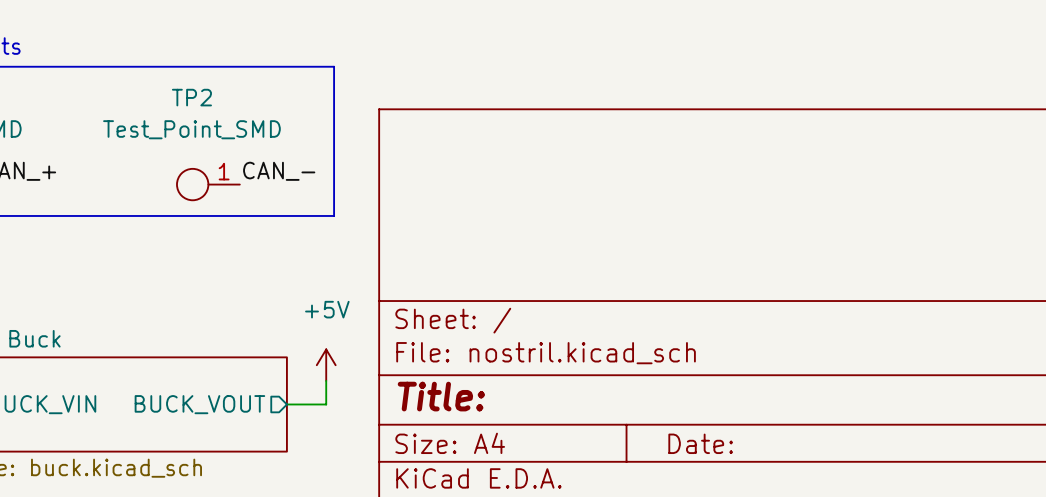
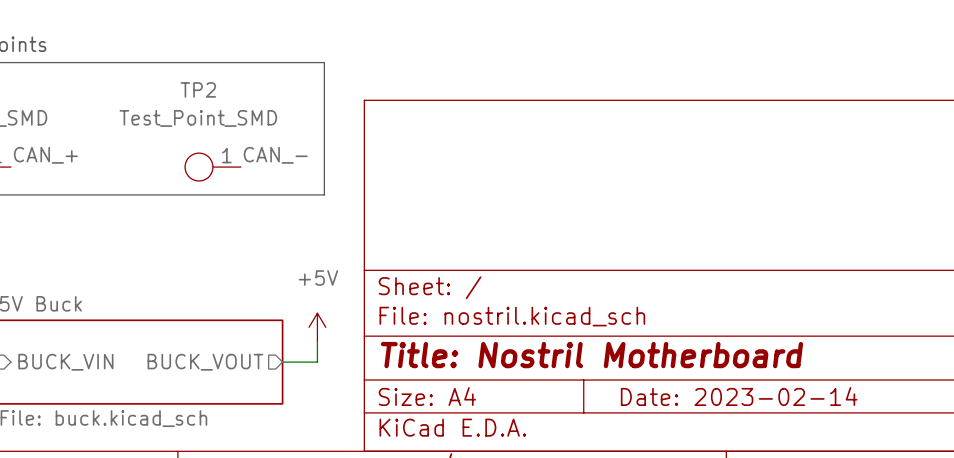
title block: Title: (441, 396) -> Title: Nostril Motherboard (591, 355)
title block: Date: (700, 443) -> Date: 2023-02-14 (739, 396)

